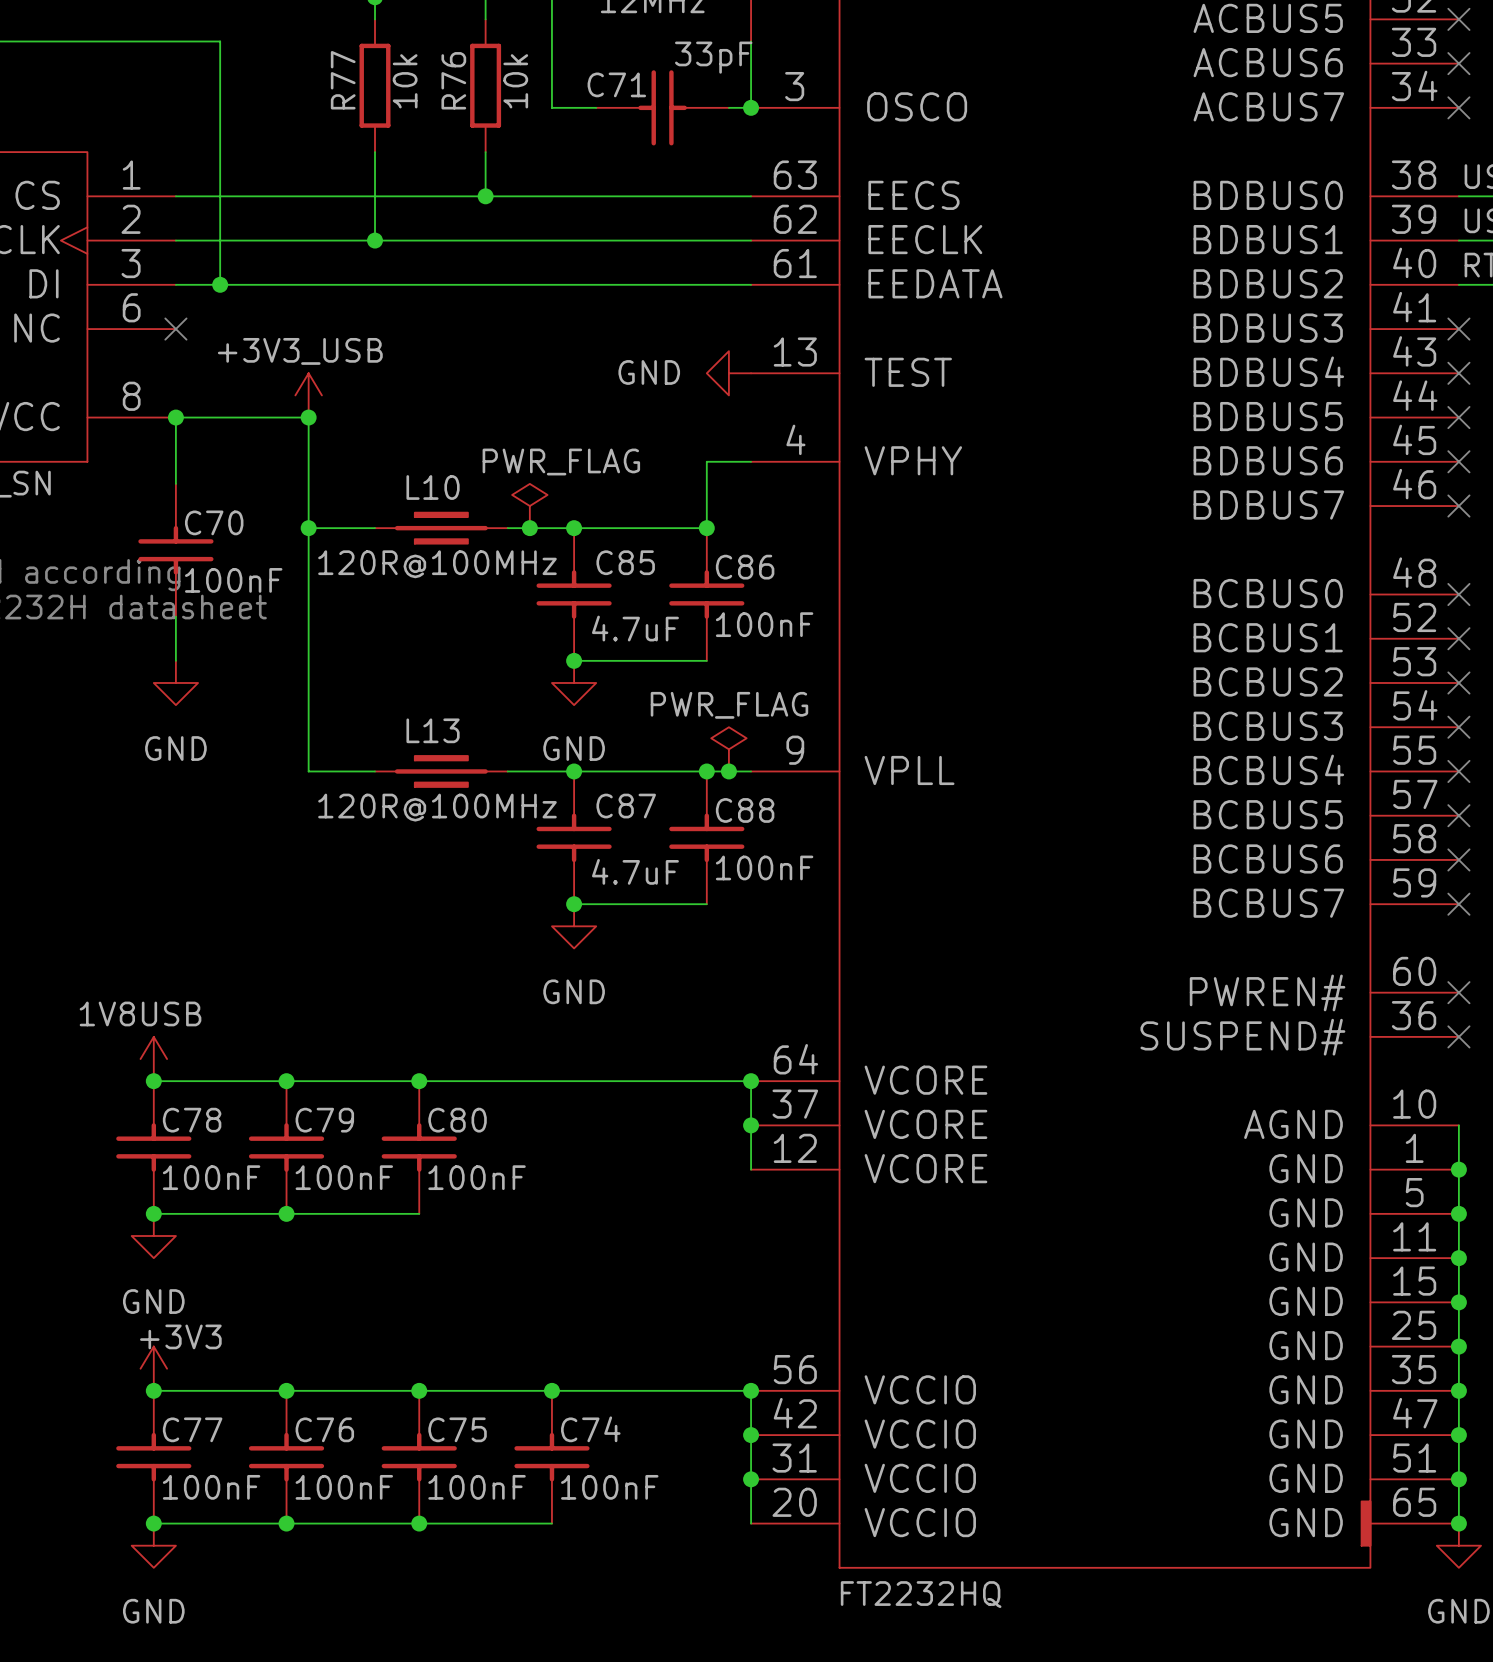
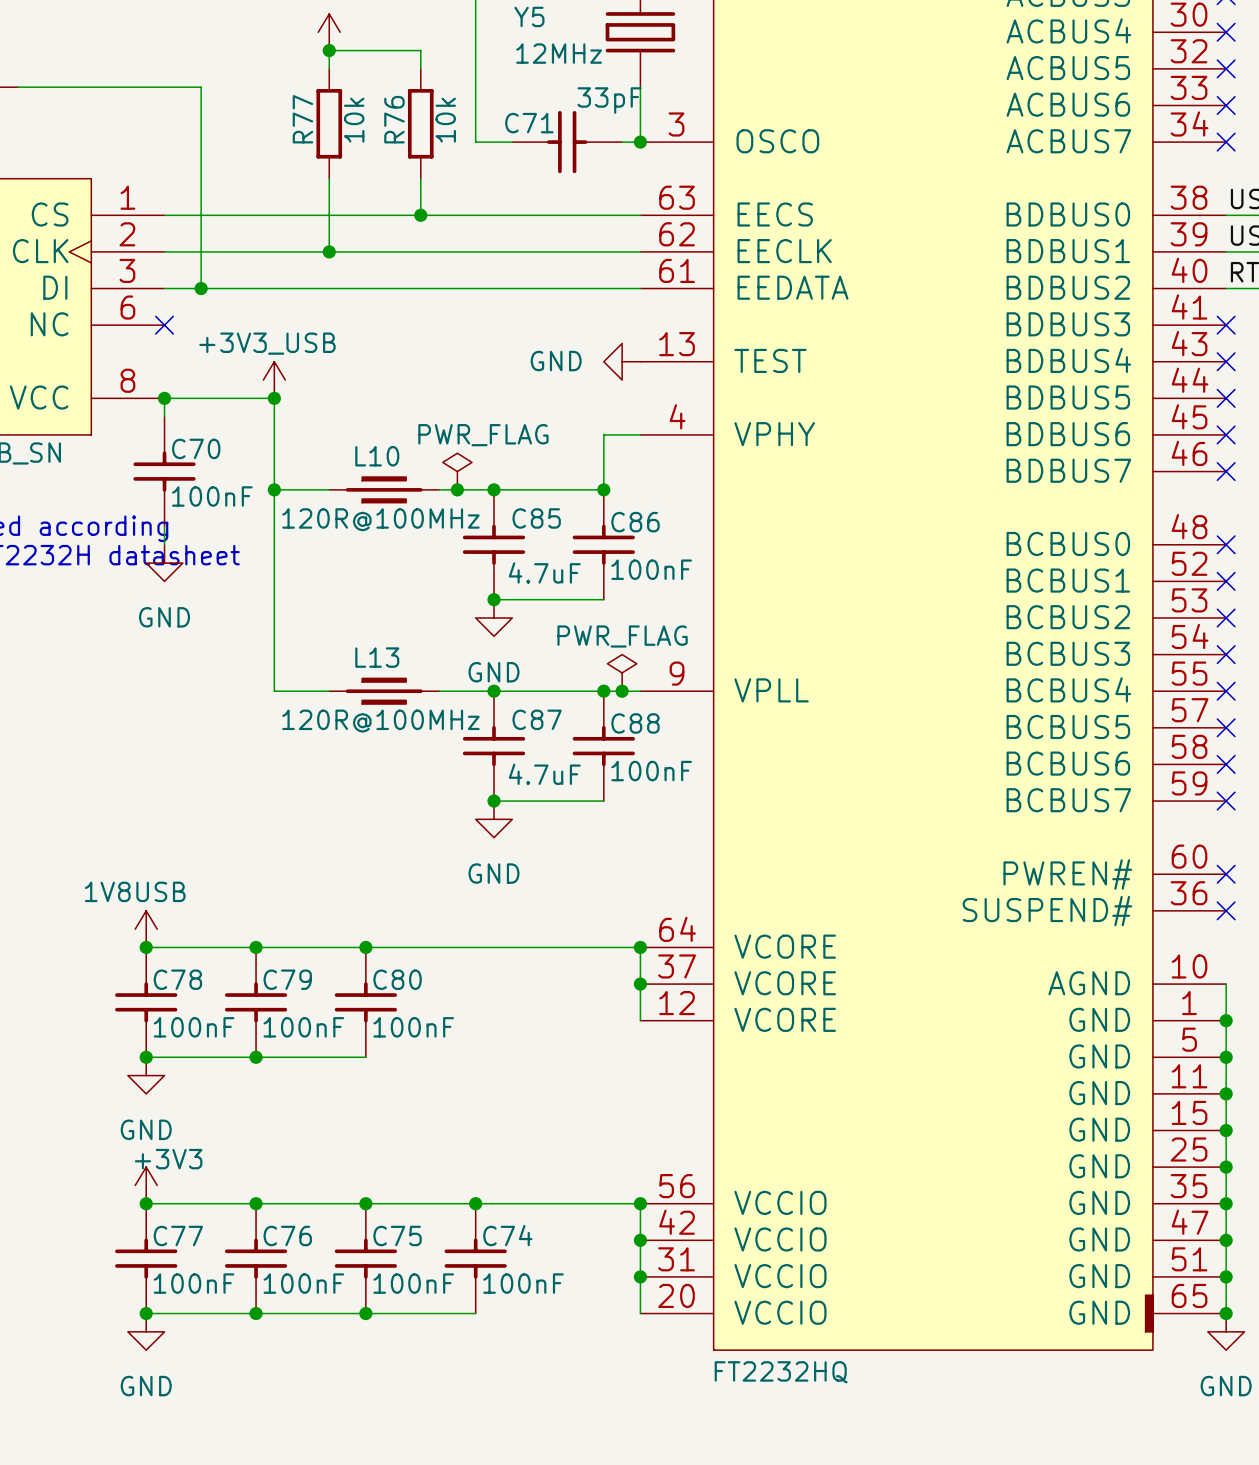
C70 position: (175, 550) -> (164, 471)
wire: (175, 616) (175, 660) -> none
power symbol position: GND (175, 682) -> GND (164, 563)

